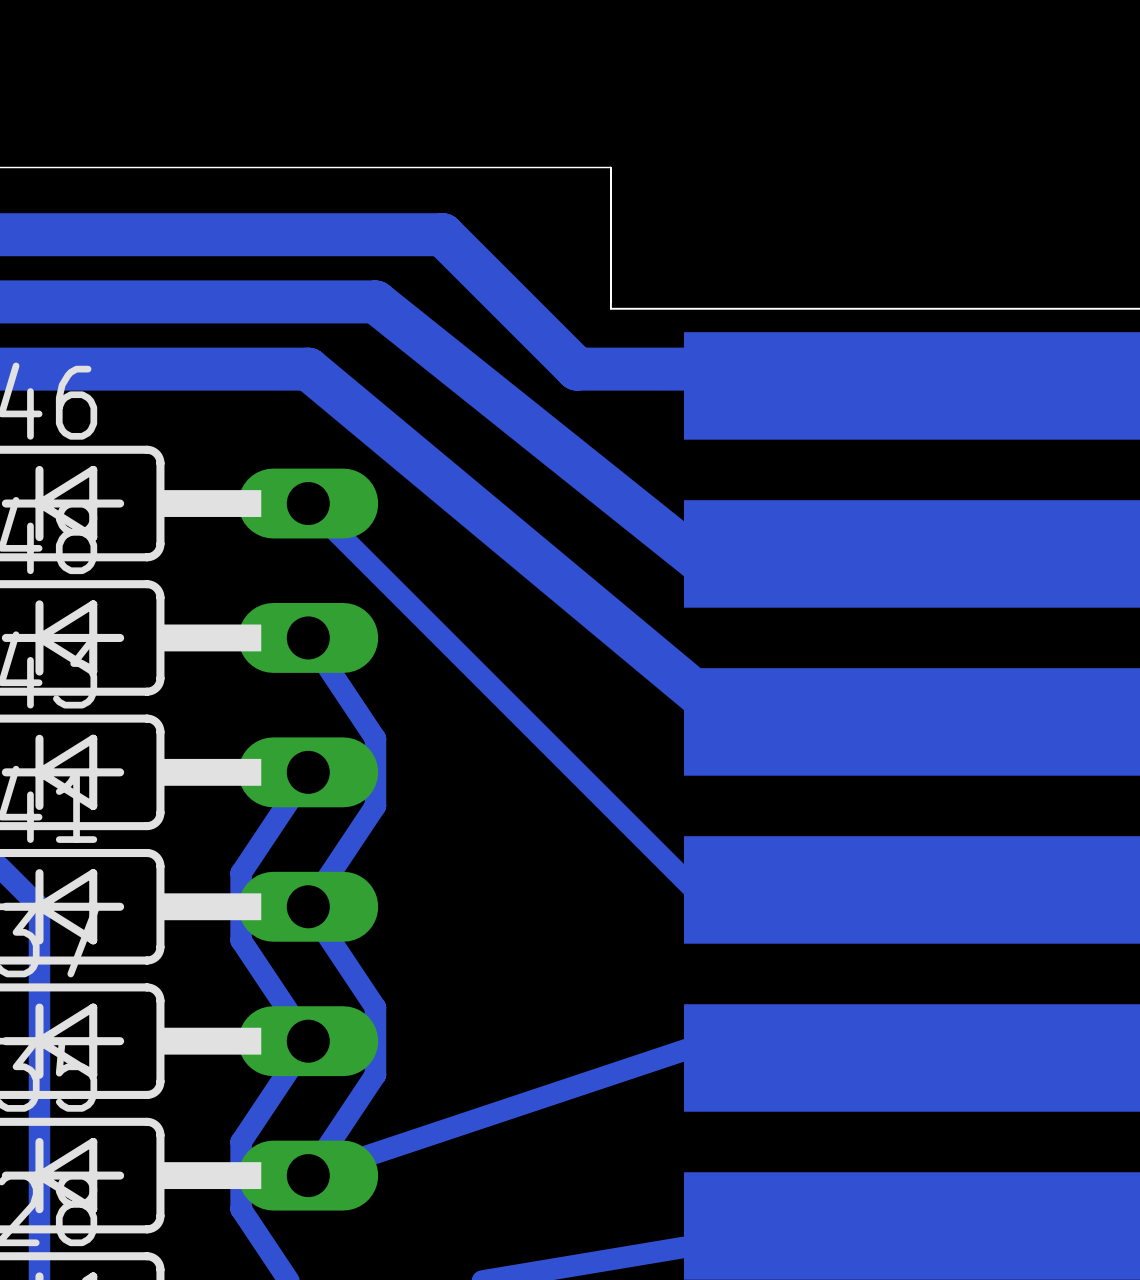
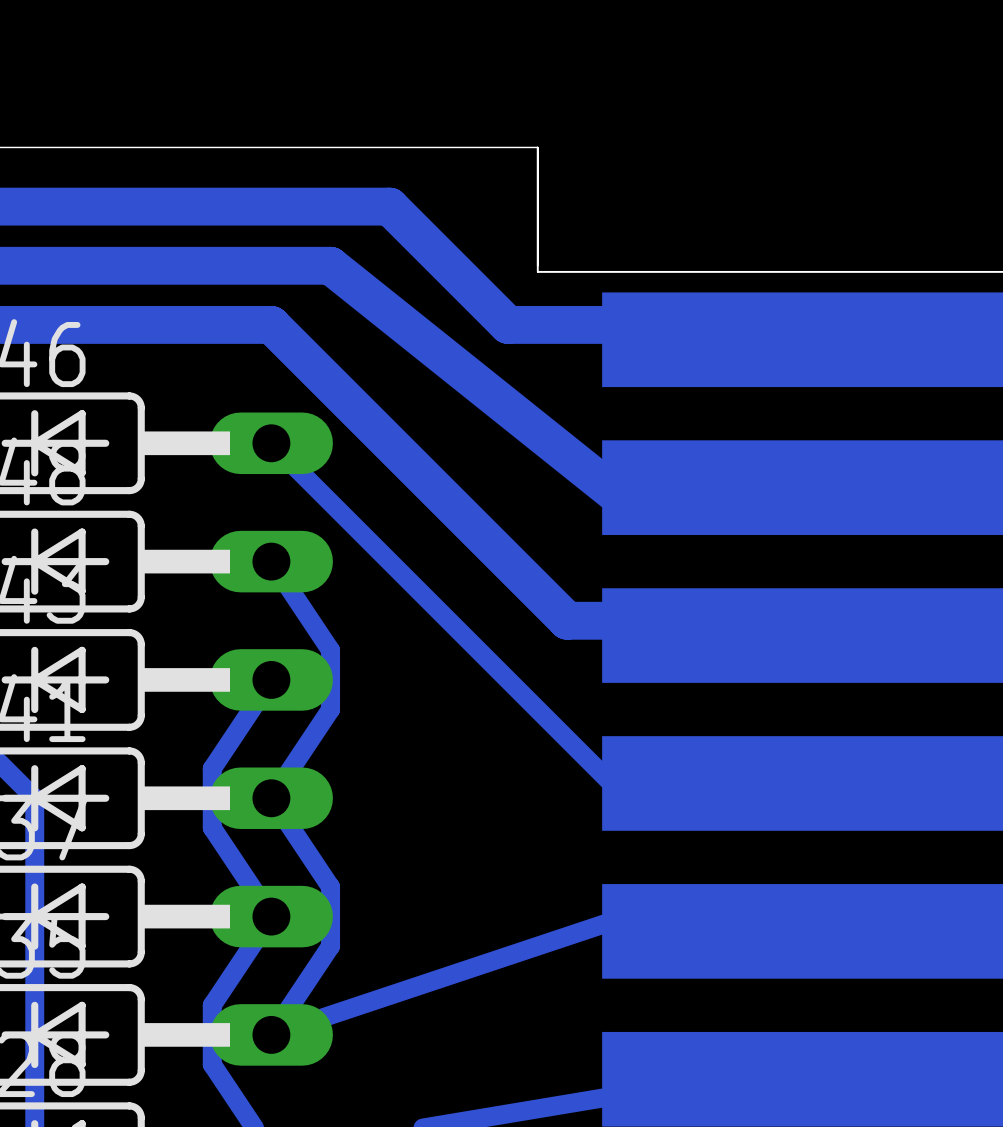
bottom track: (308, 369) (711, 705) -> (271, 324) (567, 620) (626, 620)

